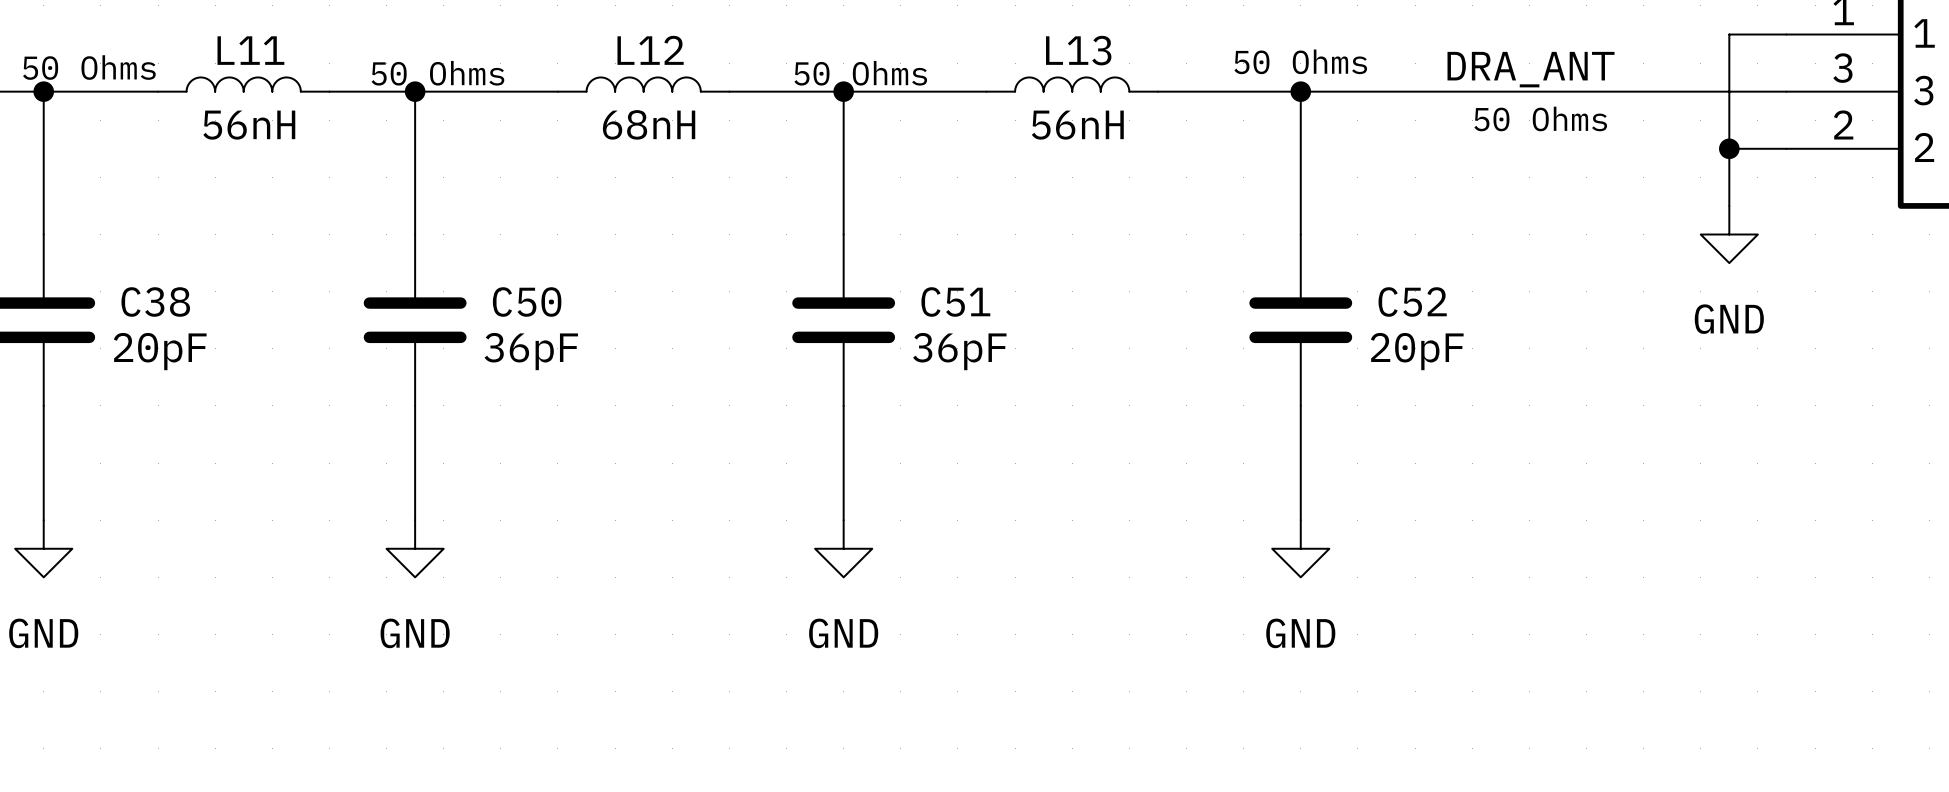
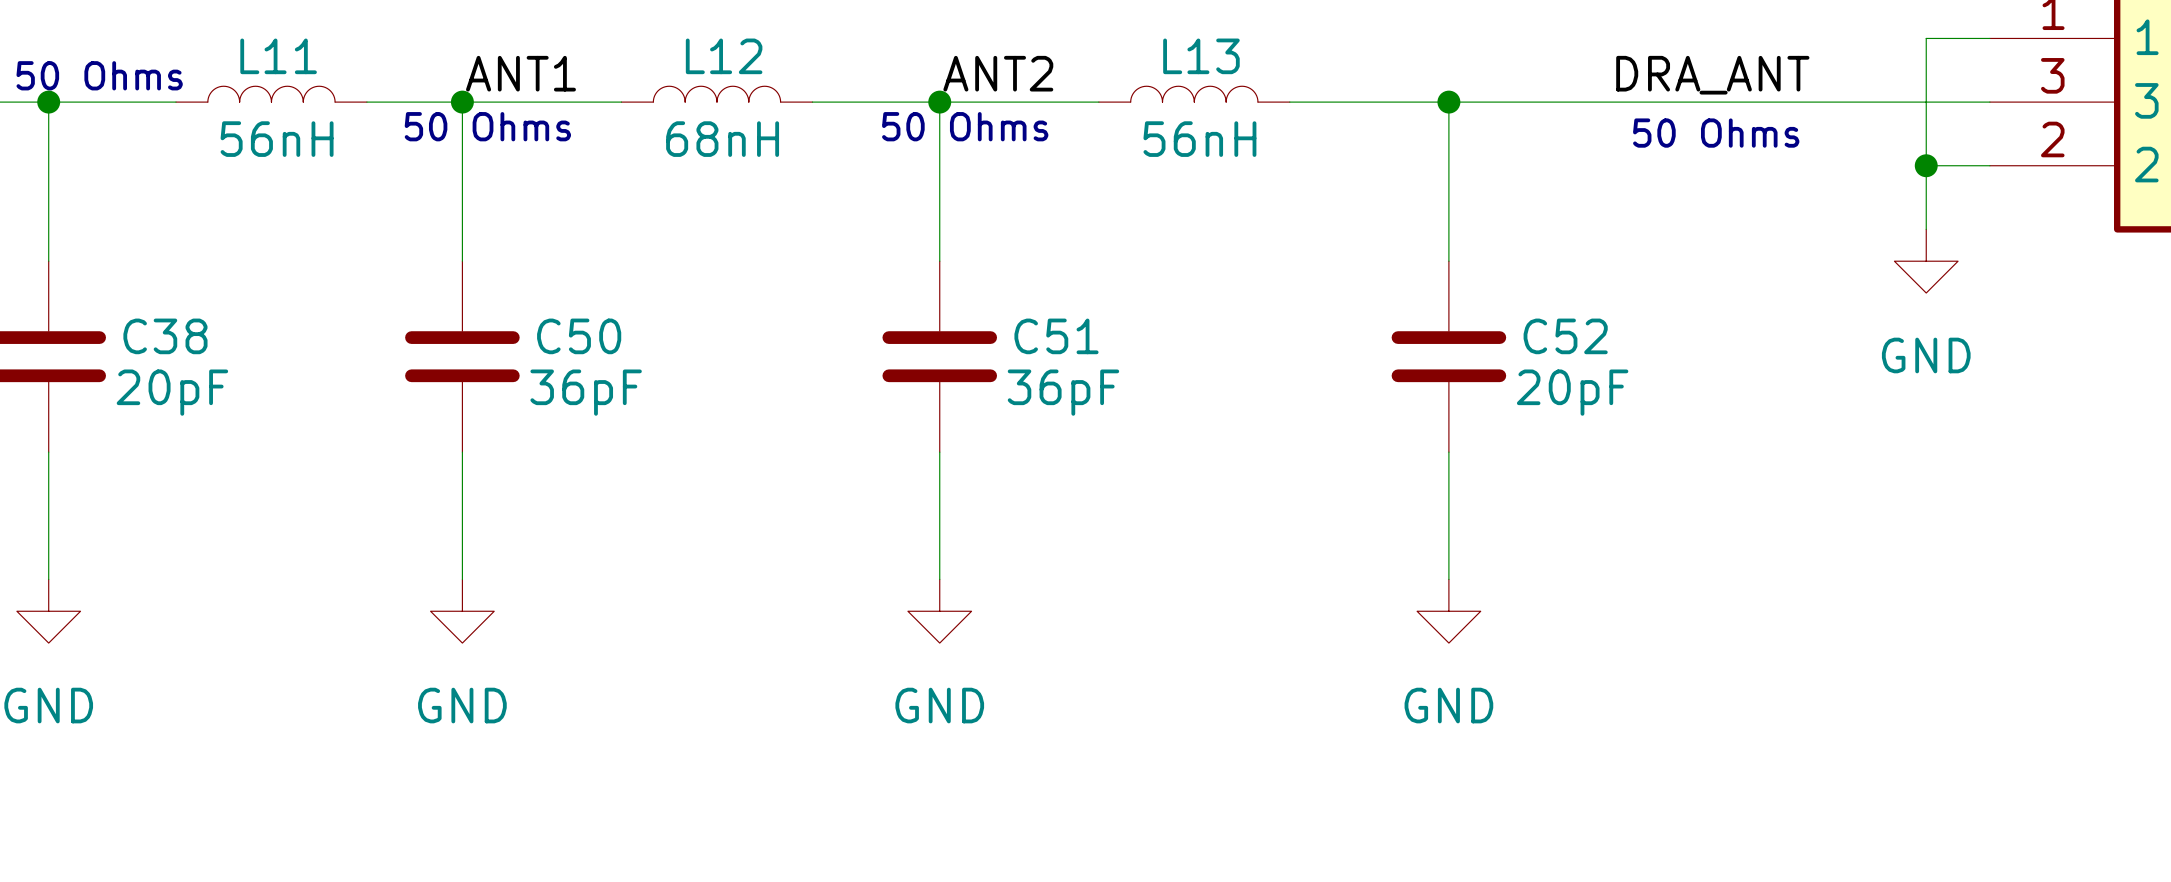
text: 50 Ohms (1300, 61) -> none
label: none -> ANT2 (998, 73)
label: none -> ANT1 (520, 73)
text position: 50 Ohms (437, 73) -> 50 Ohms (487, 126)
text position: 50 Ohms (860, 73) -> 50 Ohms (965, 126)

